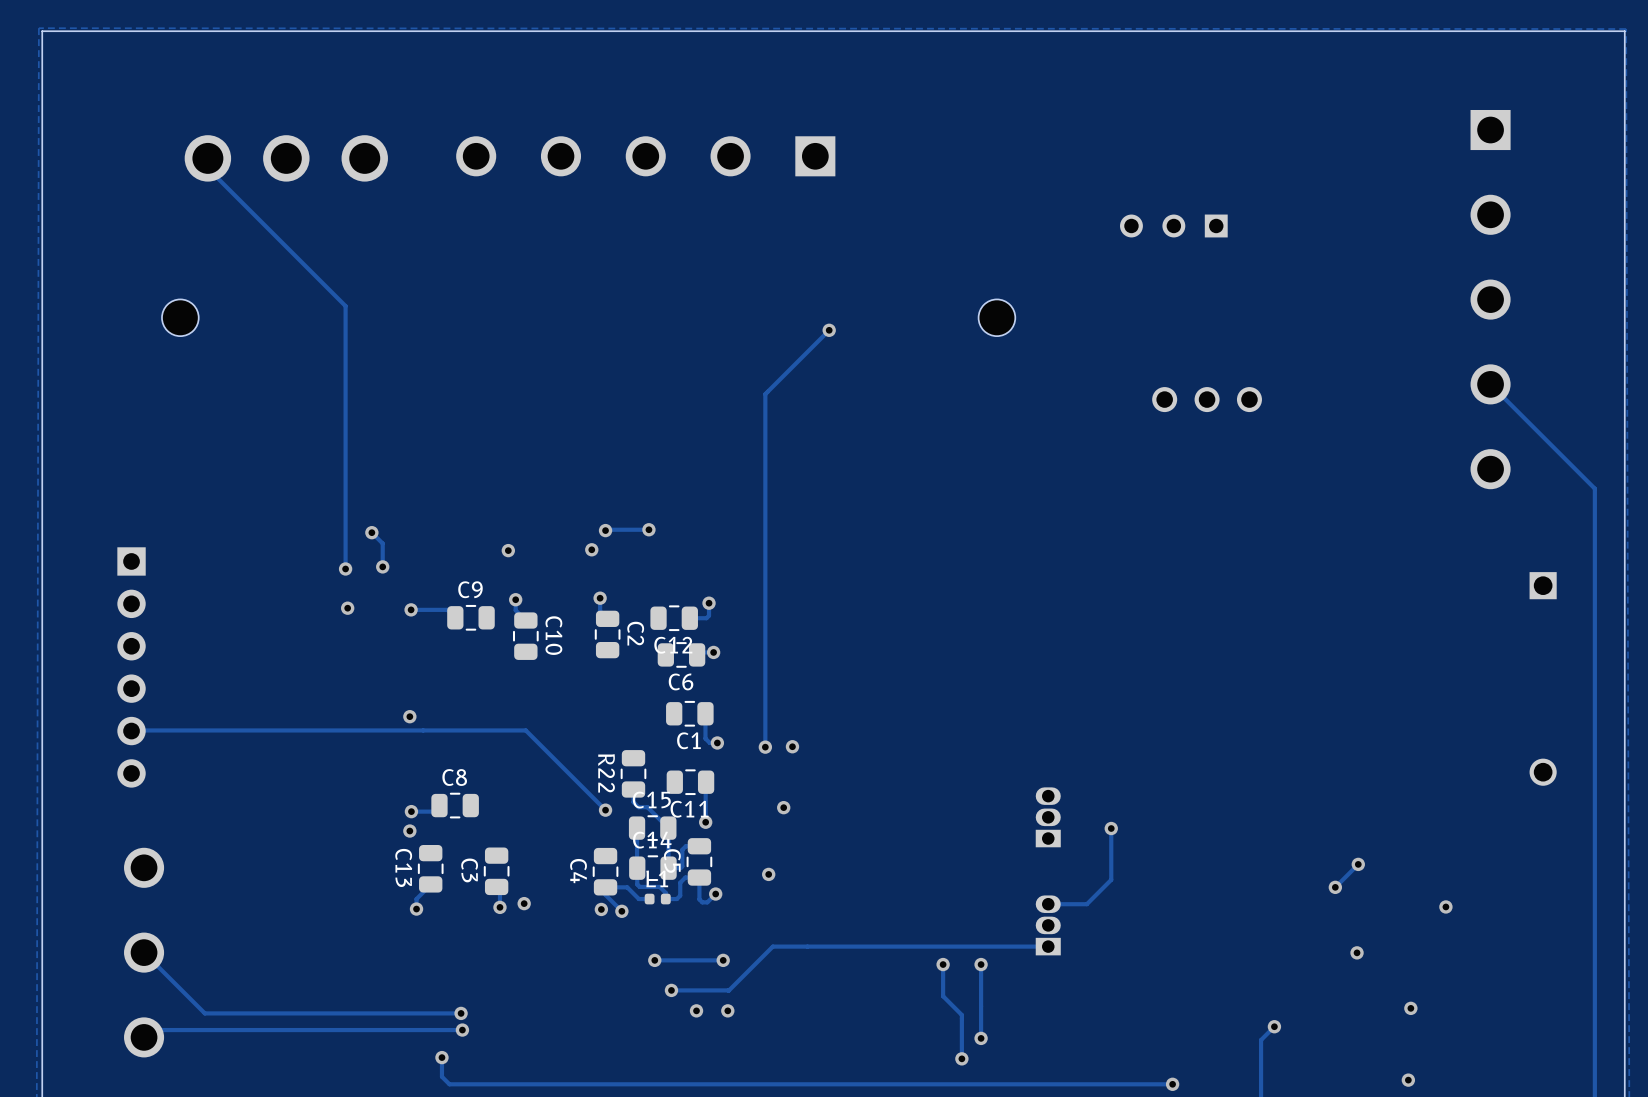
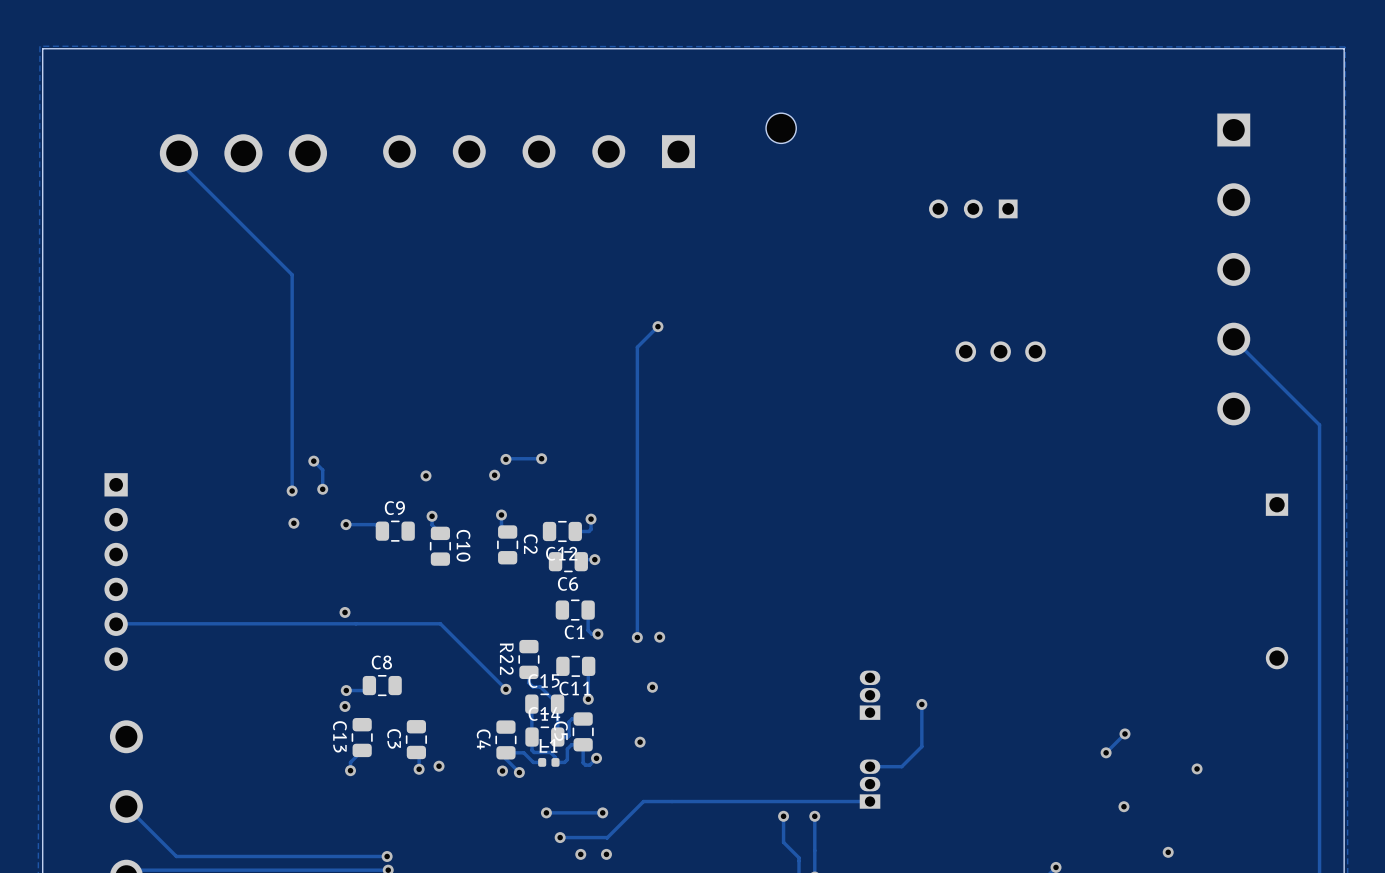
part: (180, 317) -> none
part position: (996, 317) -> (781, 128)
track: (829, 330) (790, 369) -> none
via position: (829, 330) -> (657, 326)

